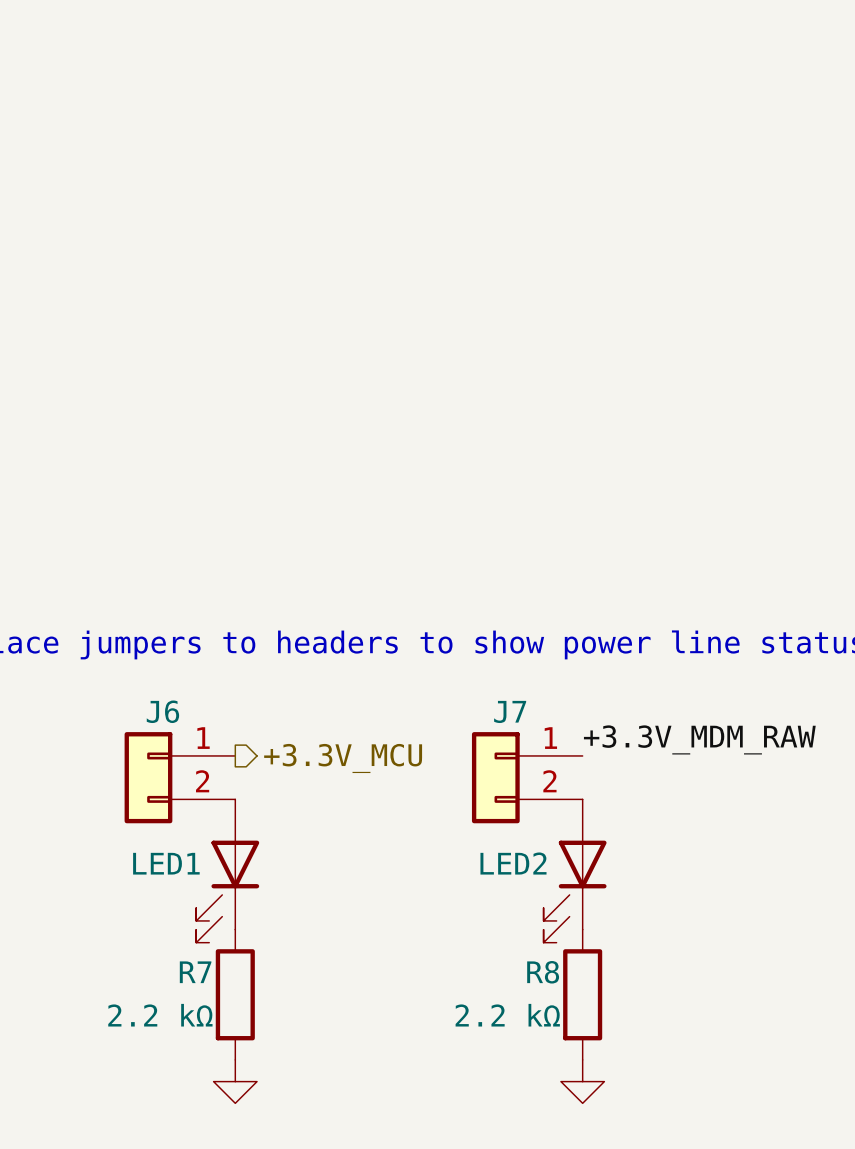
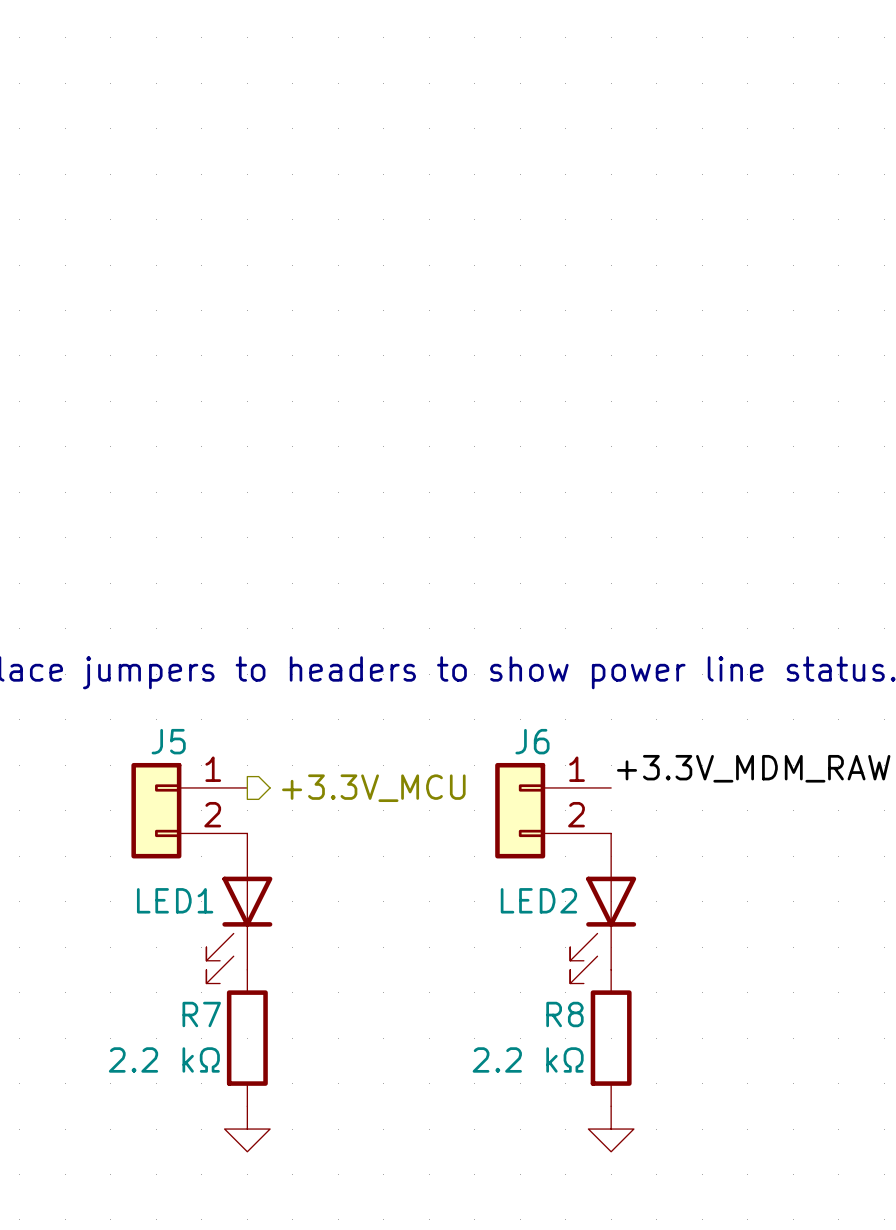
J6 name: J6 (162, 711) -> J5 (168, 741)
J7 name: J7 (510, 711) -> J6 (532, 741)

